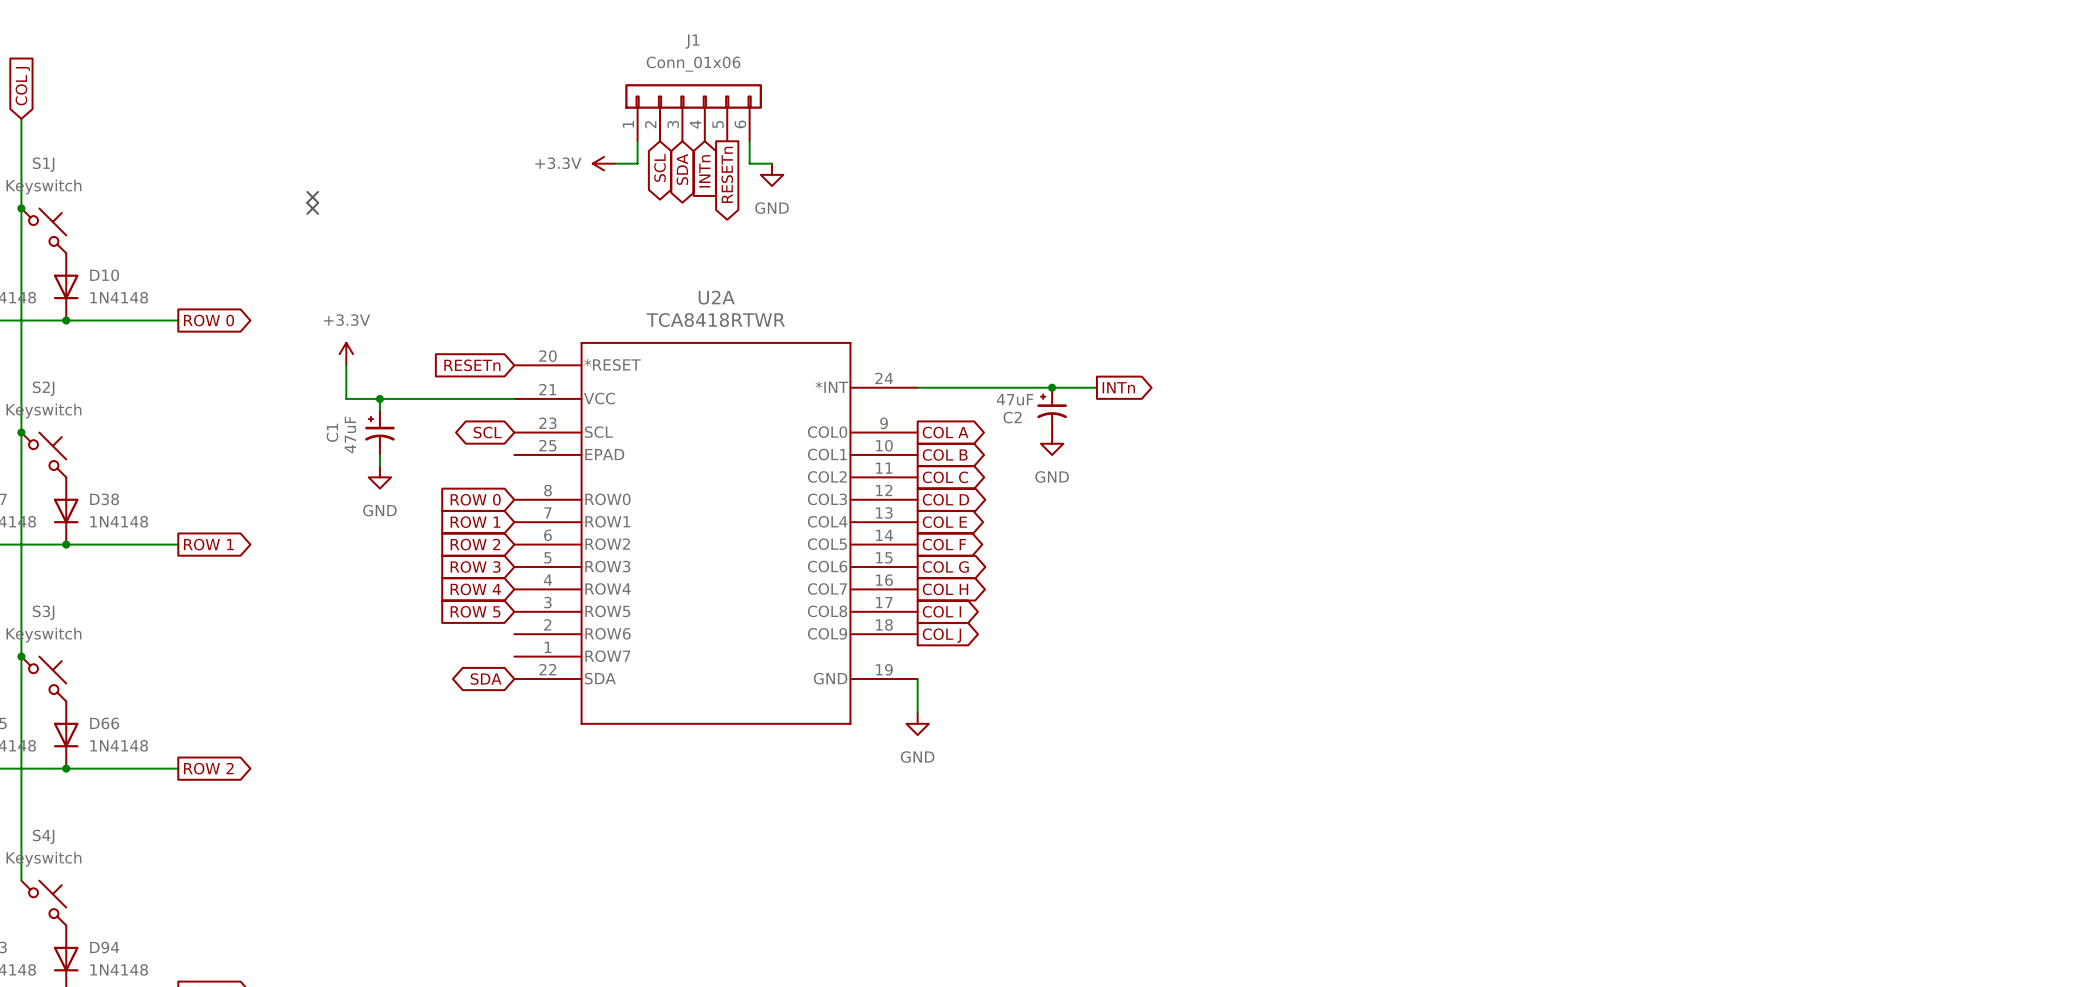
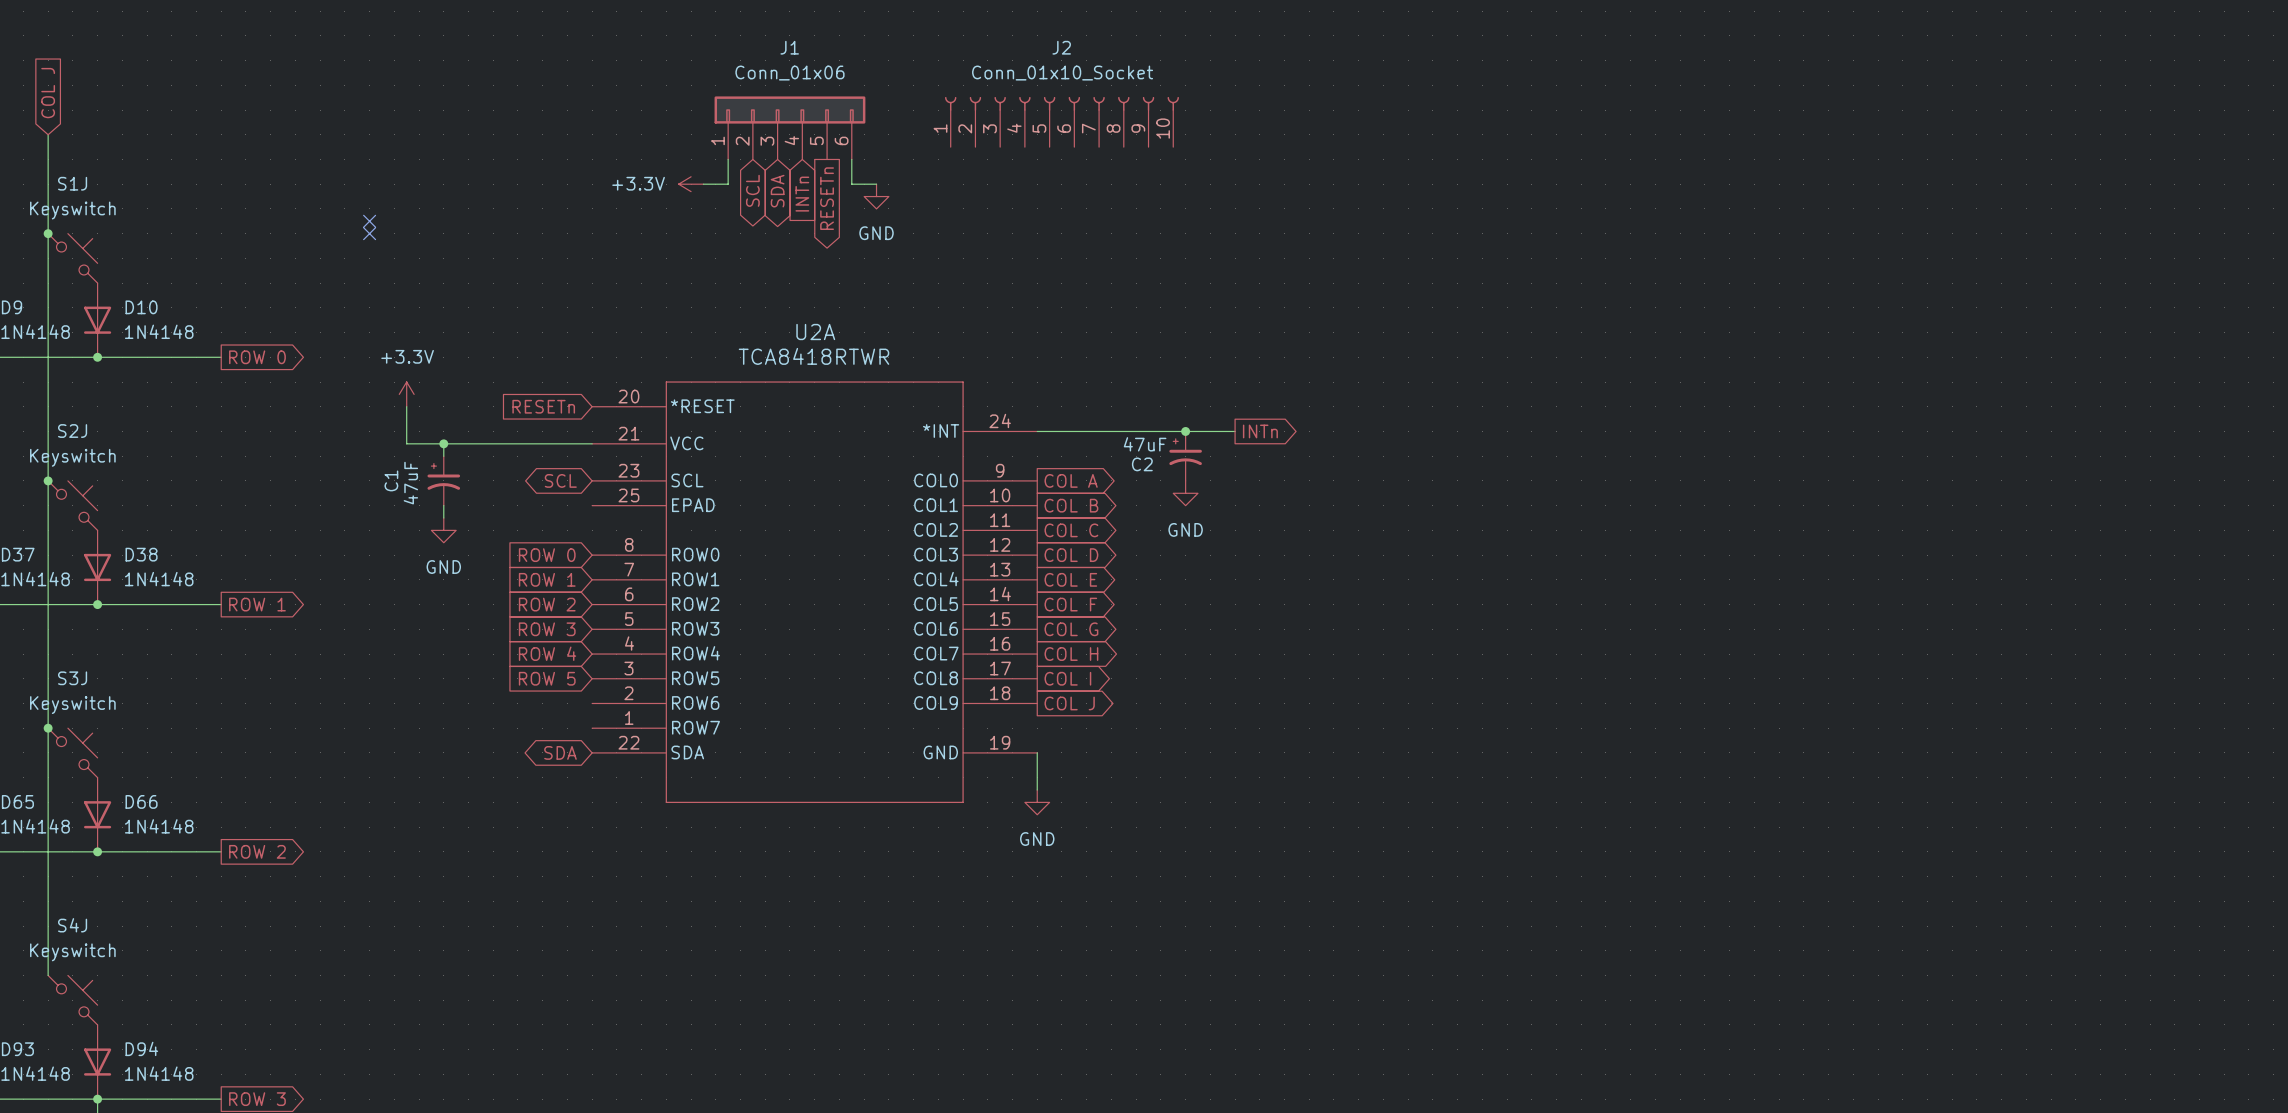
J2: none -> Conn_01x10_Socket (1061, 122)

